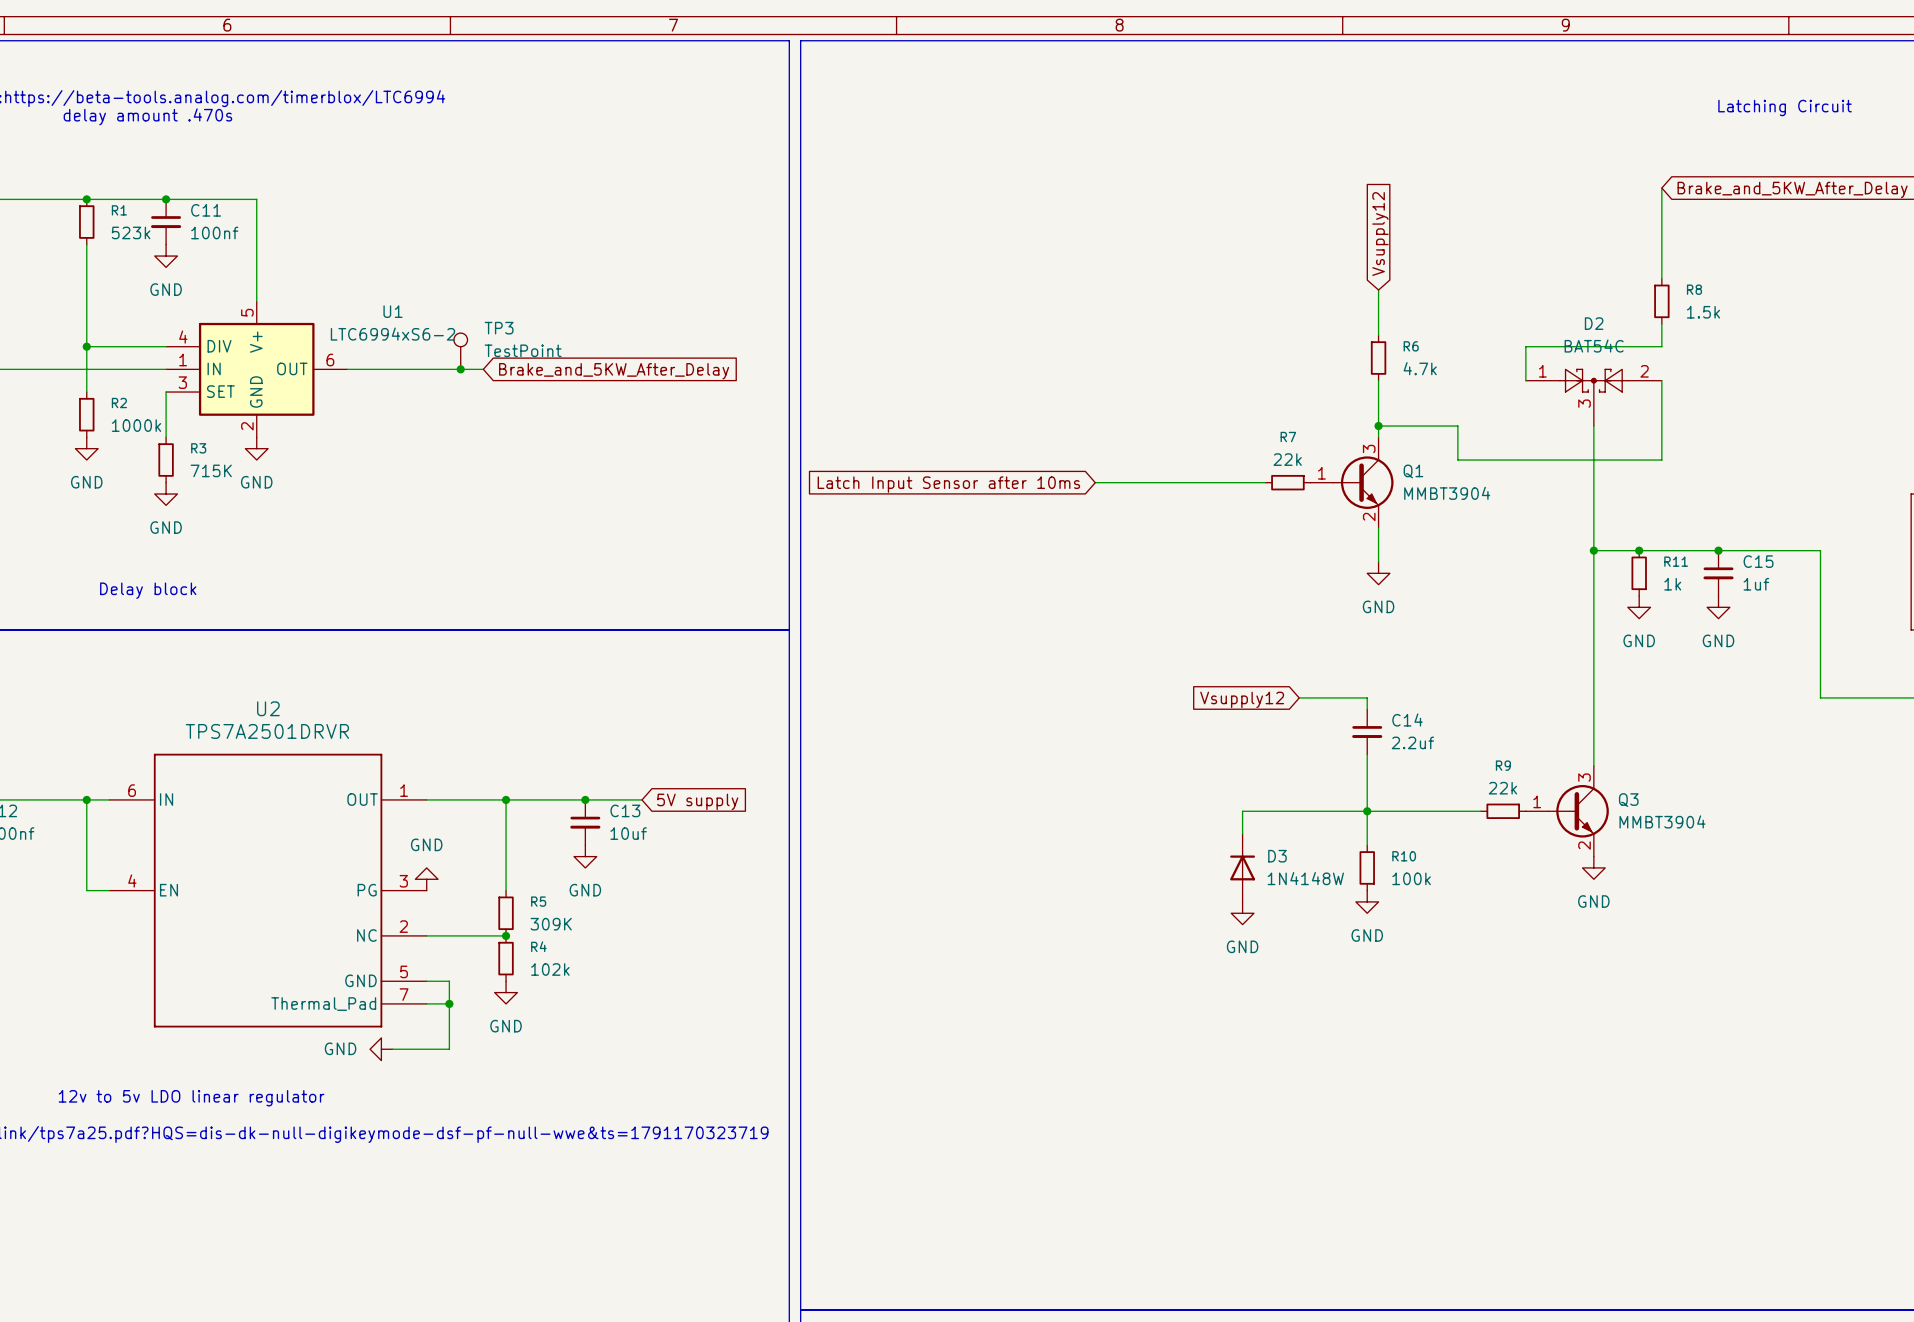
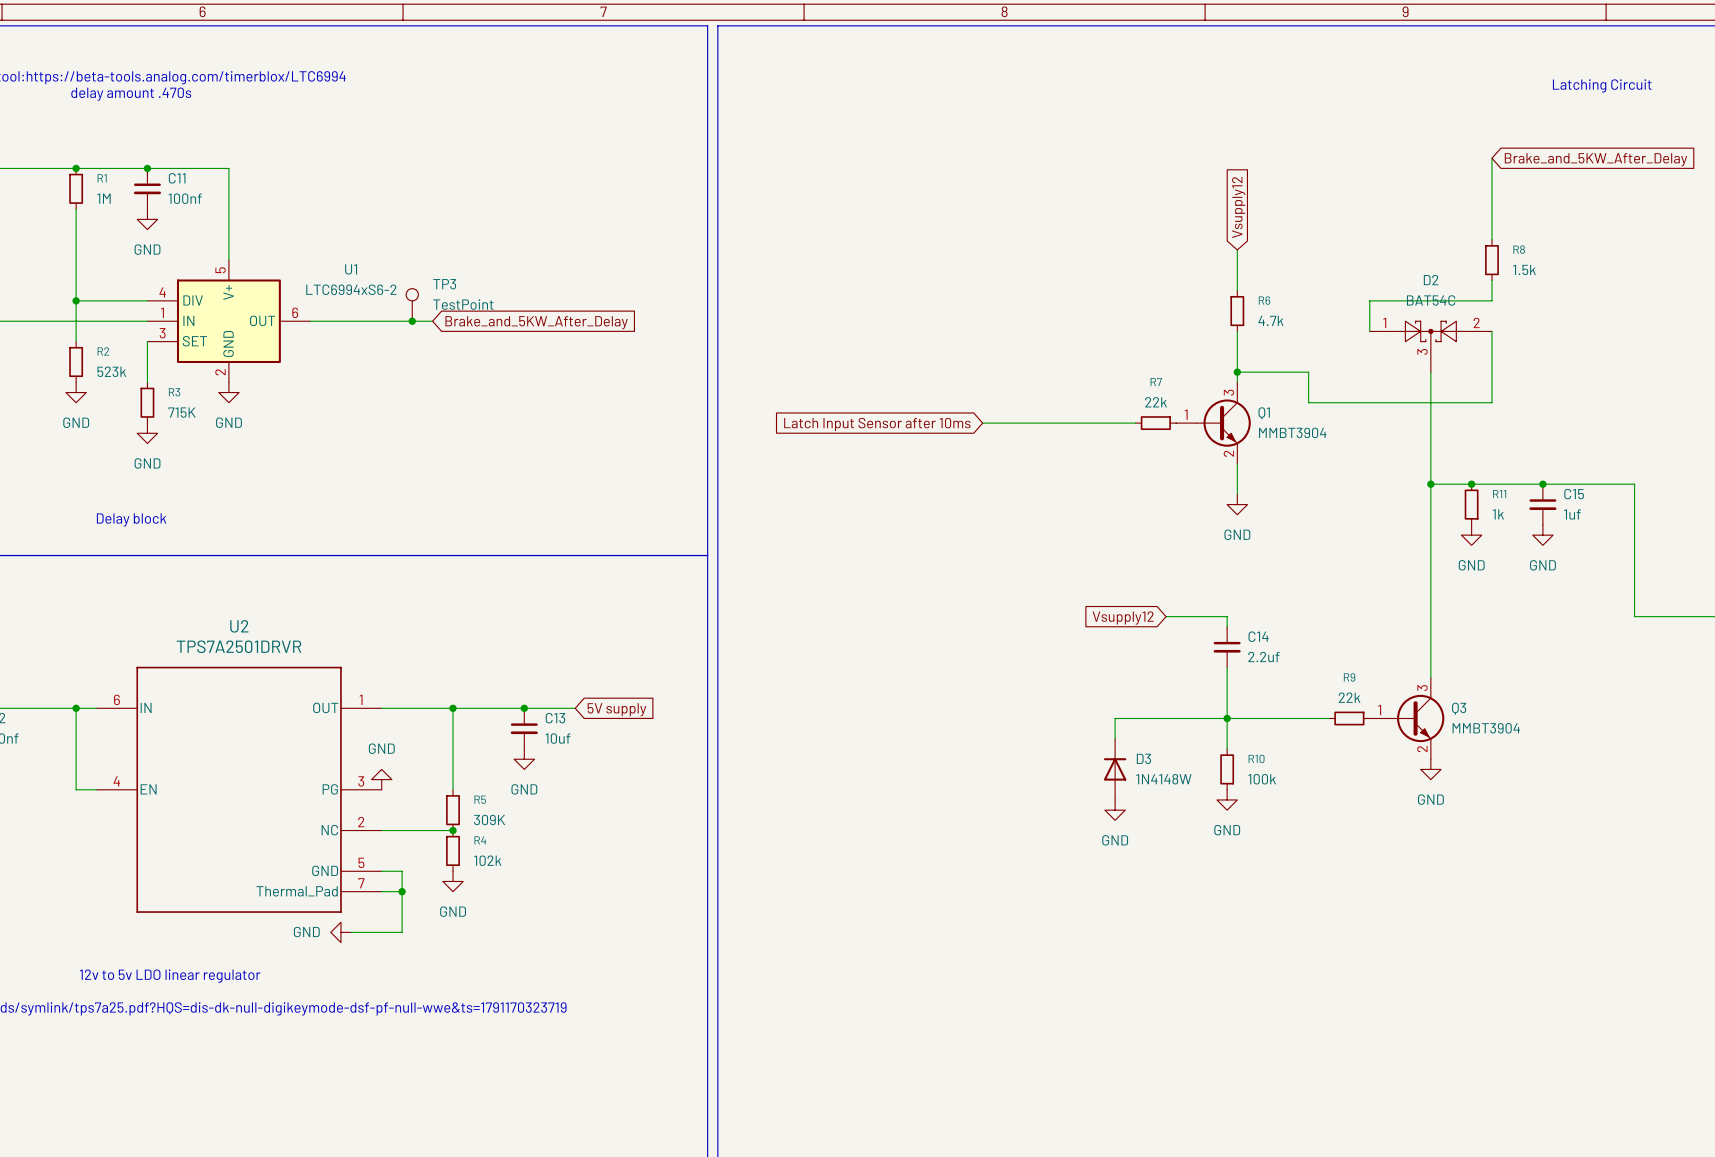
R1 value: 523k (131, 232) -> 1M (104, 198)
R2 value: 1000k (136, 425) -> 523k (111, 371)

